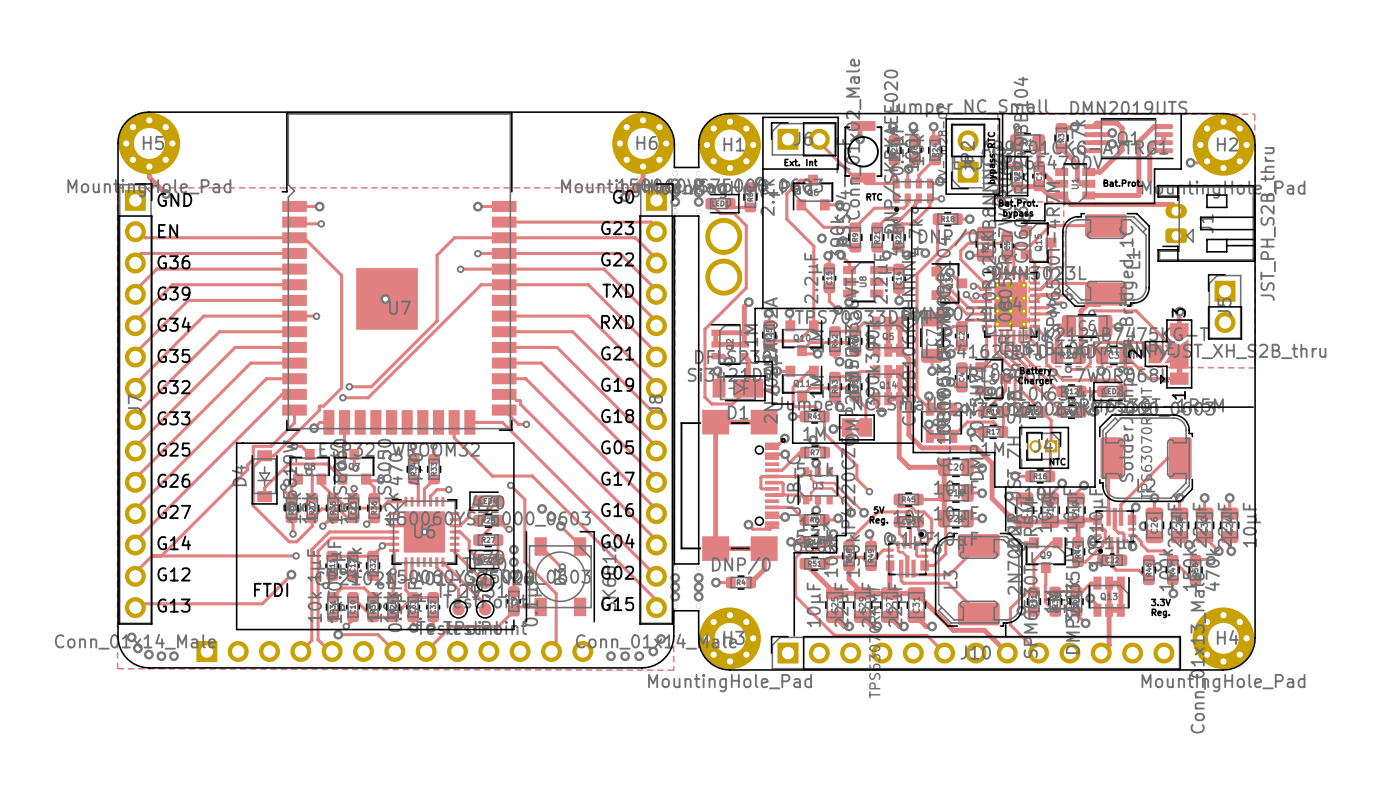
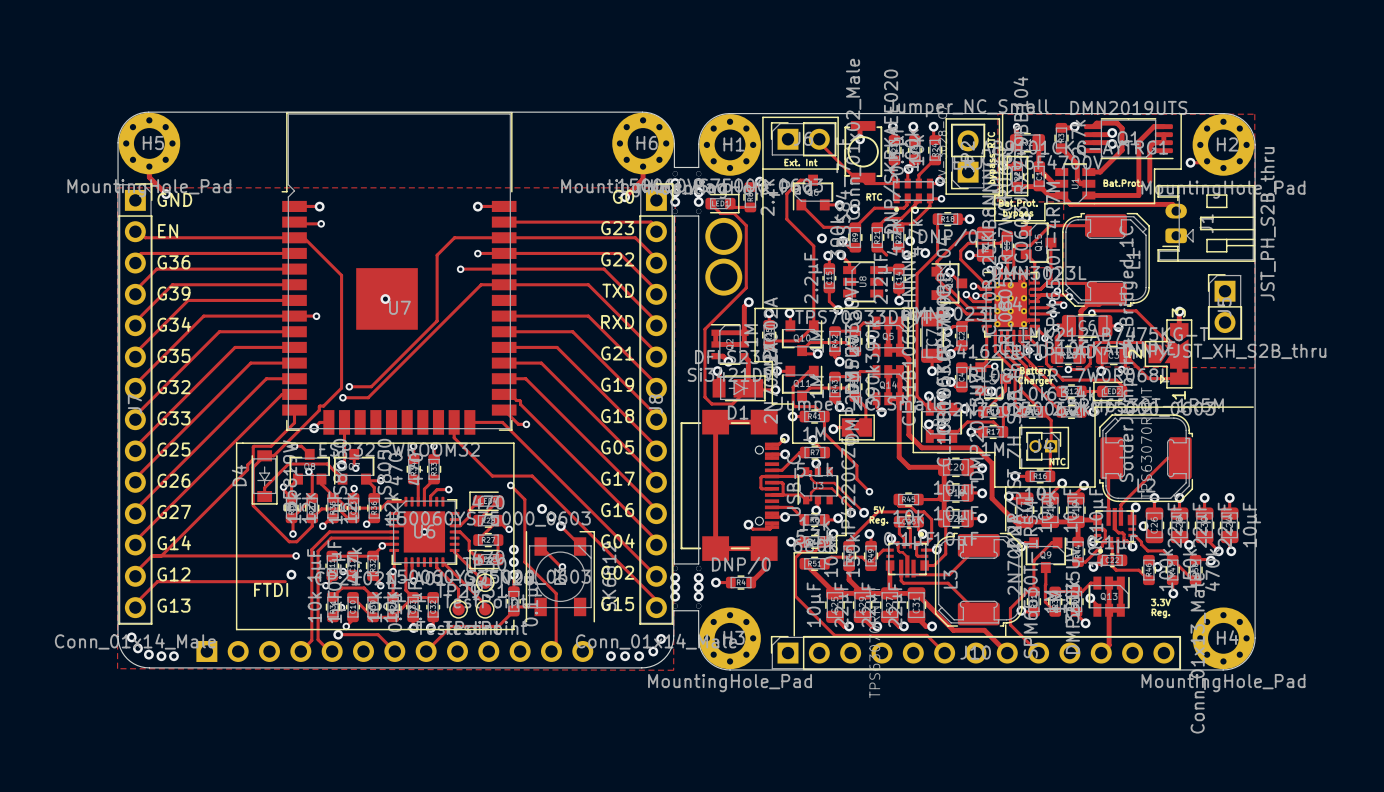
via: none -> (854, 209)
via position: (886, 255) -> (910, 241)
track: (291, 574) (262, 603) (135, 603) -> (285, 581) (157, 581) (135, 603)

